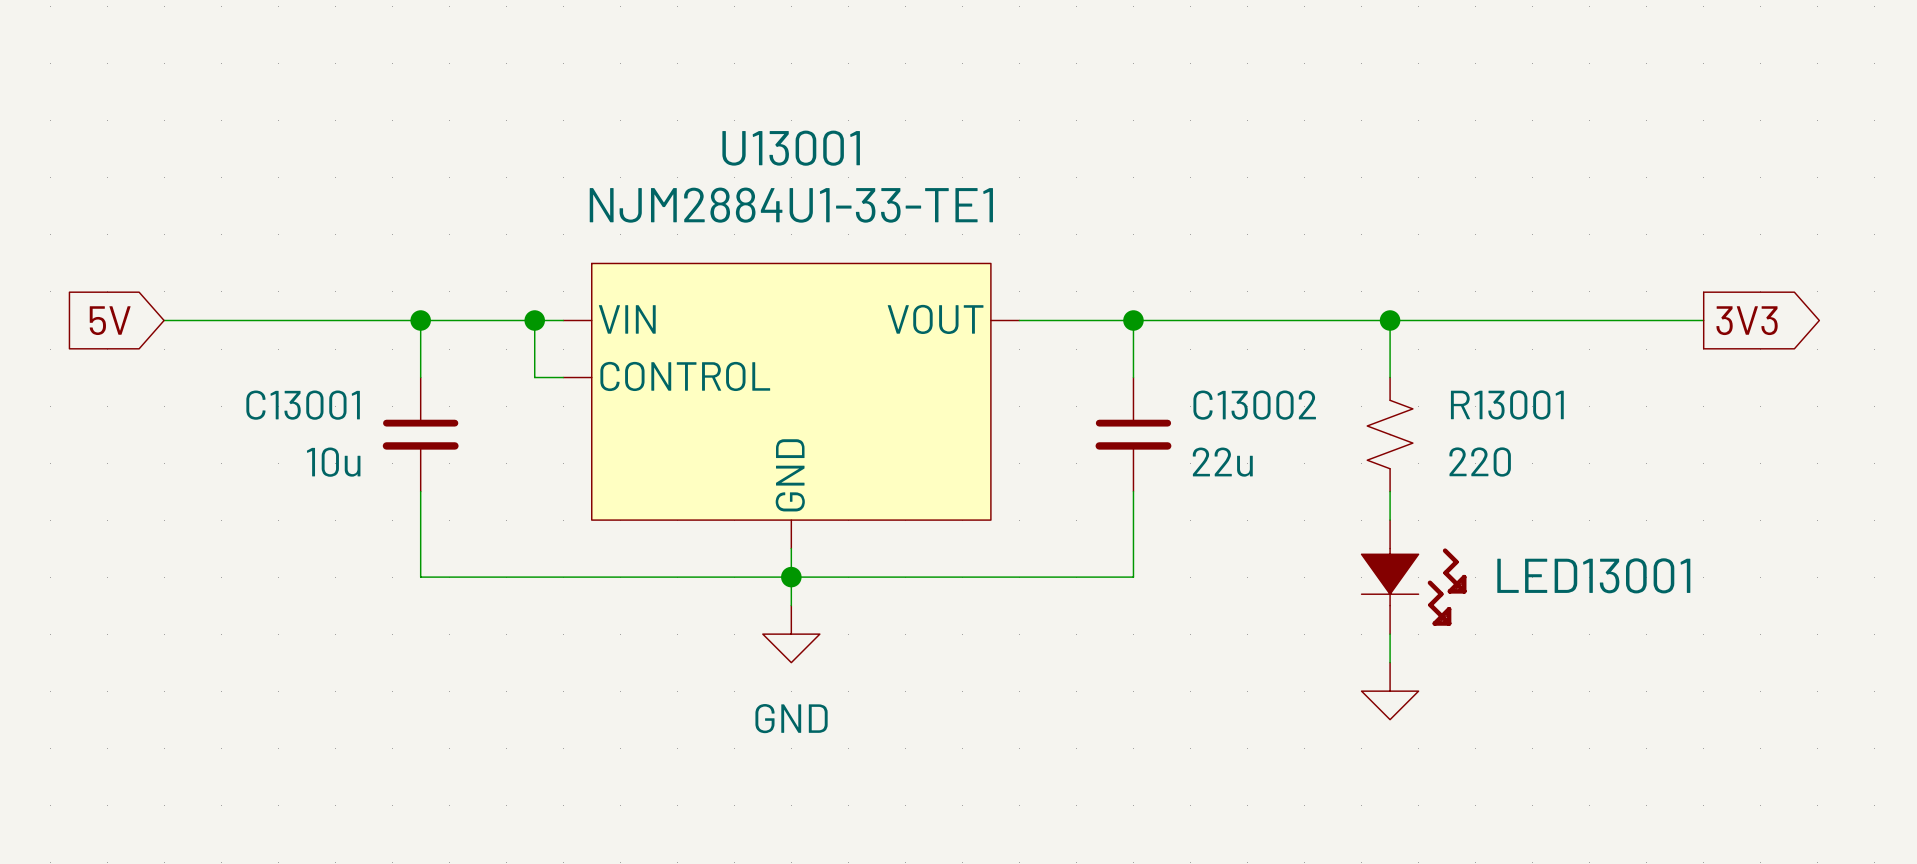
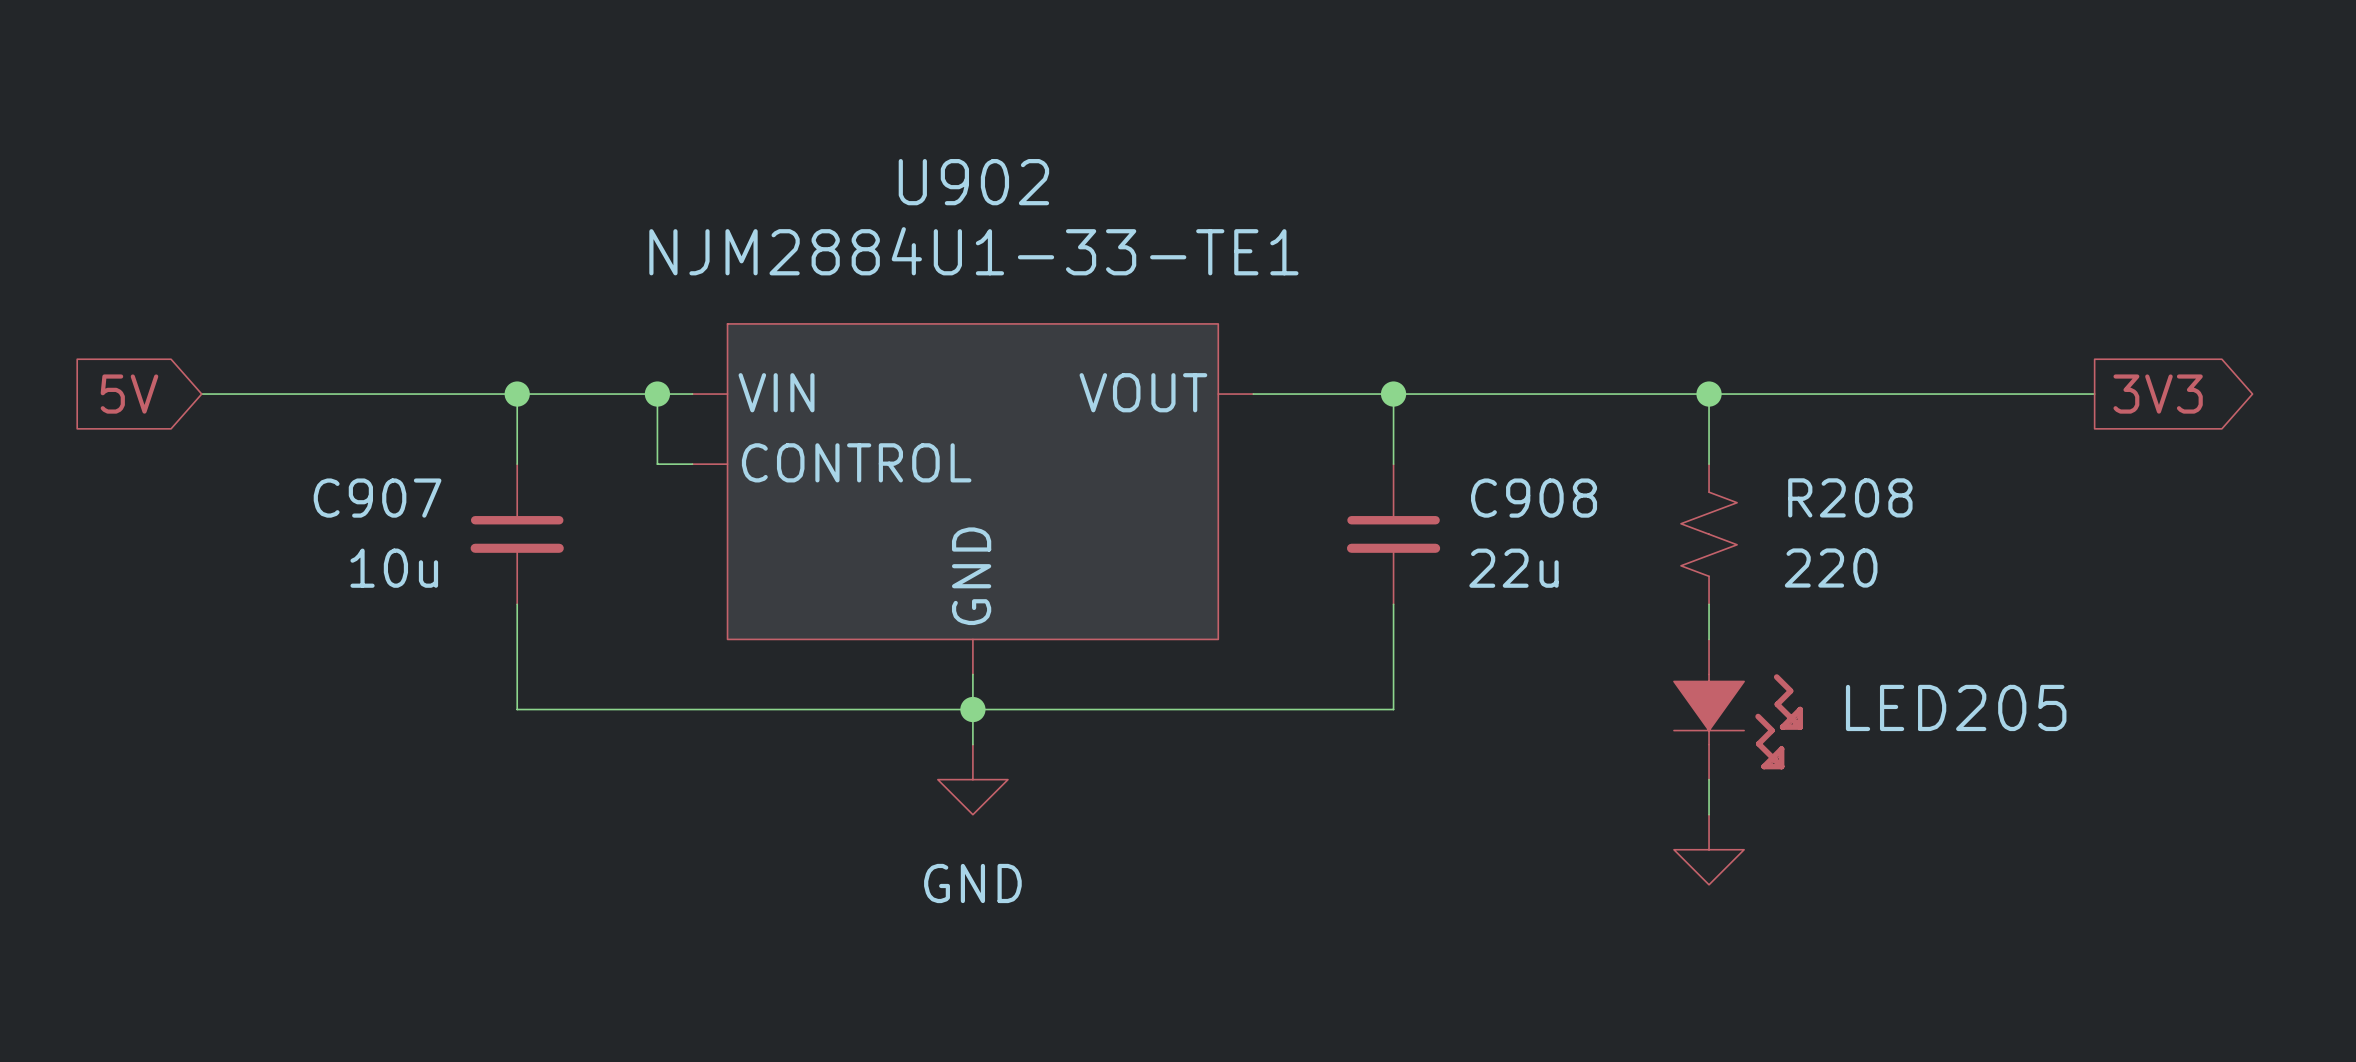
U13001 name: U13001 (791, 148) -> U902 (973, 182)
R13001 name: R13001 (1507, 404) -> R208 (1850, 497)
C13001 name: C13001 (303, 405) -> C907 (377, 498)
C13002 name: C13002 (1254, 405) -> C908 (1534, 498)
LED13001 name: LED13001 (1593, 575) -> LED205 (1956, 707)

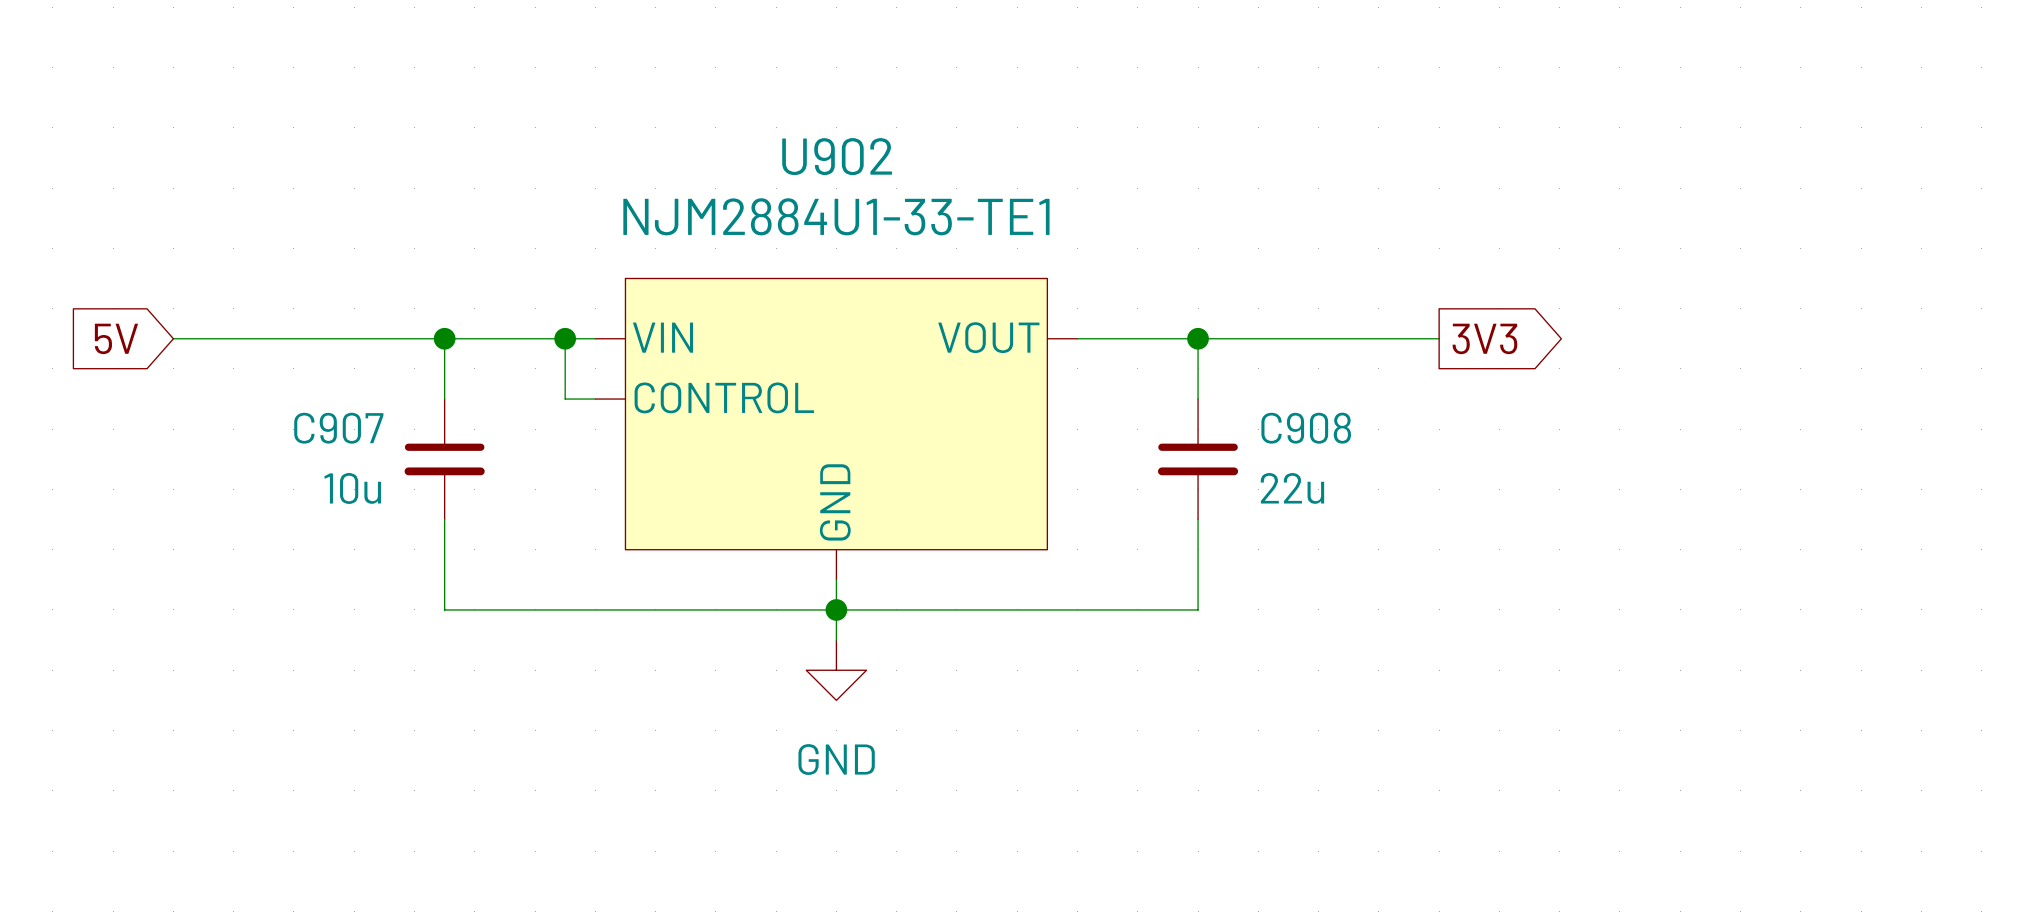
wire: (1673, 394) (2094, 394) -> none
wire: (1709, 394) (1709, 464) -> none
junction: (1709, 394) -> none
global label position: 3V3 (2158, 394) -> 3V3 (1484, 338)
R208: 220 (1709, 534) -> none
wire: (1709, 604) (1709, 639) -> none
LED205: (1738, 709) -> none
wire: (1709, 779) (1709, 814) -> none
power symbol: (1709, 849) -> none

